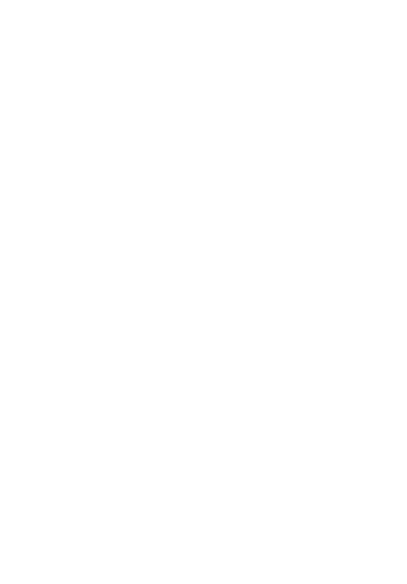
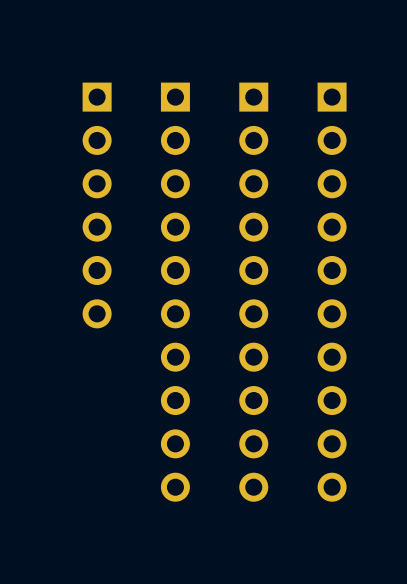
part: none -> (97, 205)
part: none -> (175, 292)
part: none -> (253, 292)
part: none -> (332, 292)

